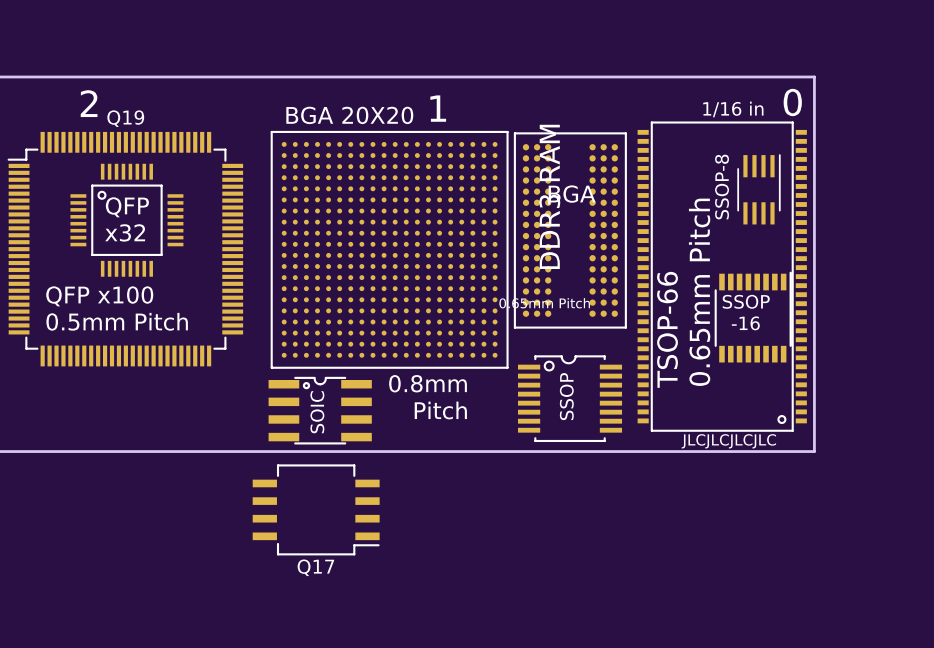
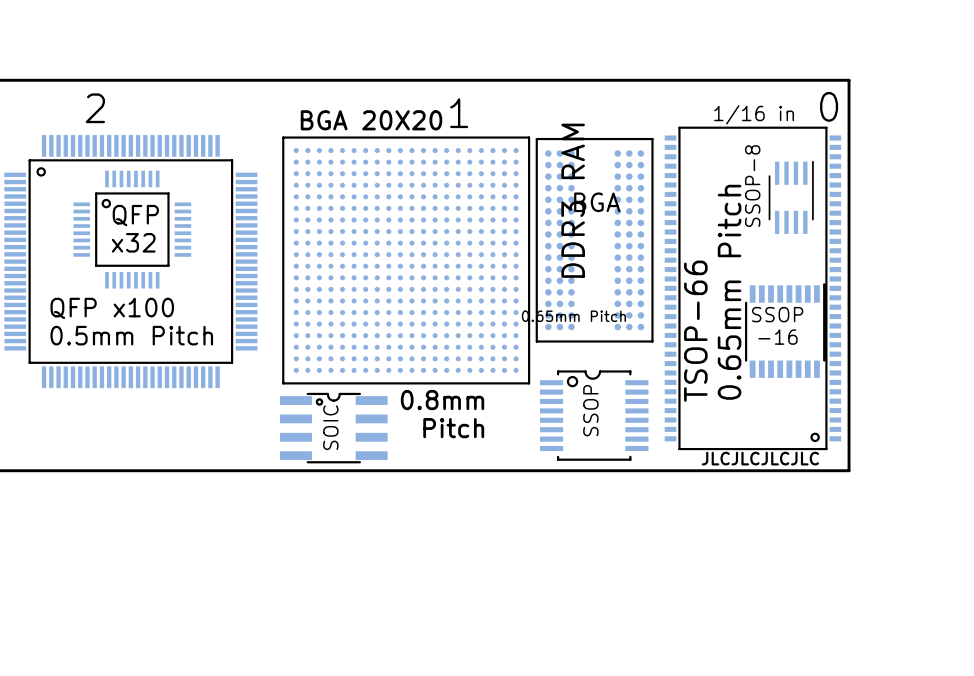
Q19: (125, 249) -> none
part: none -> (130, 261)
Q17: (316, 509) -> none

